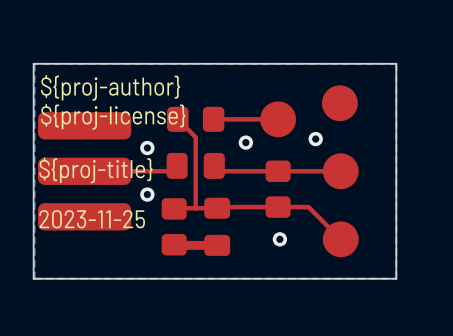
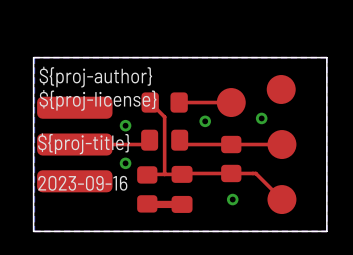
text: 2023-11-25 (92, 219) -> 2023-09-16 (82, 183)

